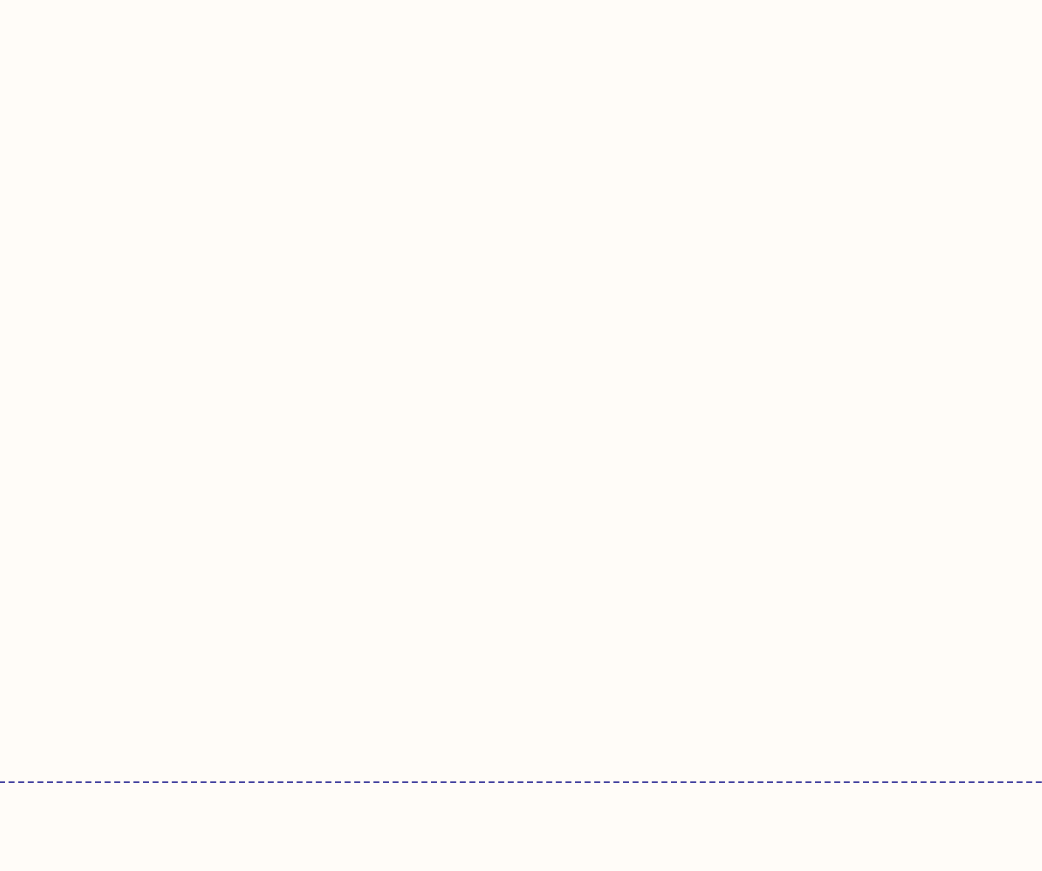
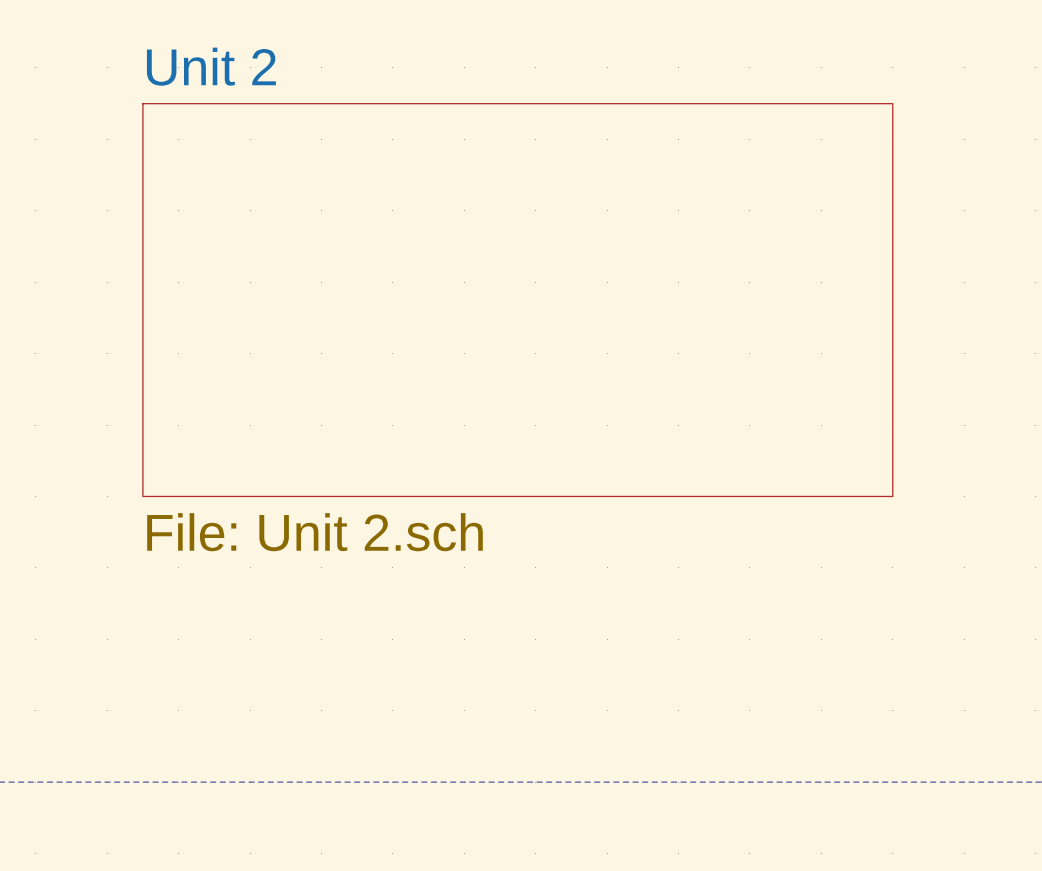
sheet Unit 2: none -> File: Unit 2.sch (517, 300)

